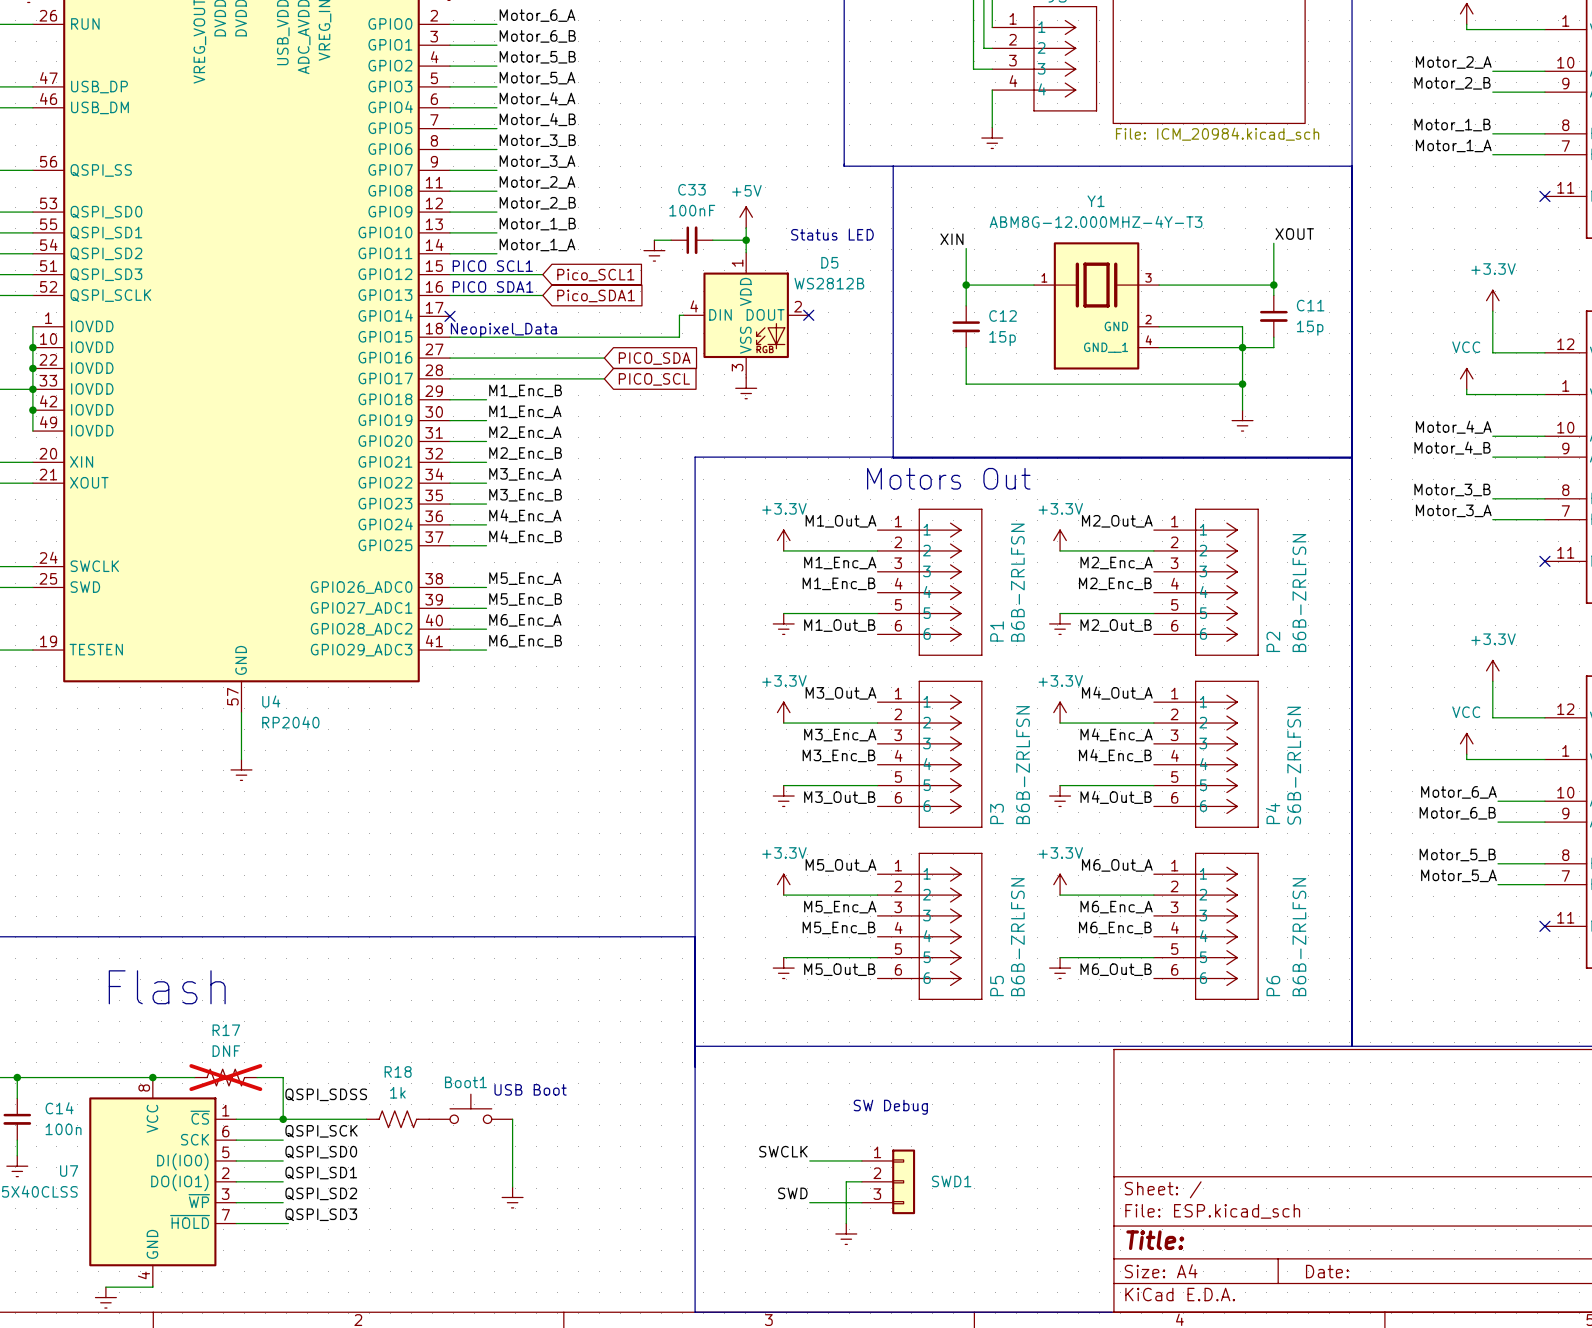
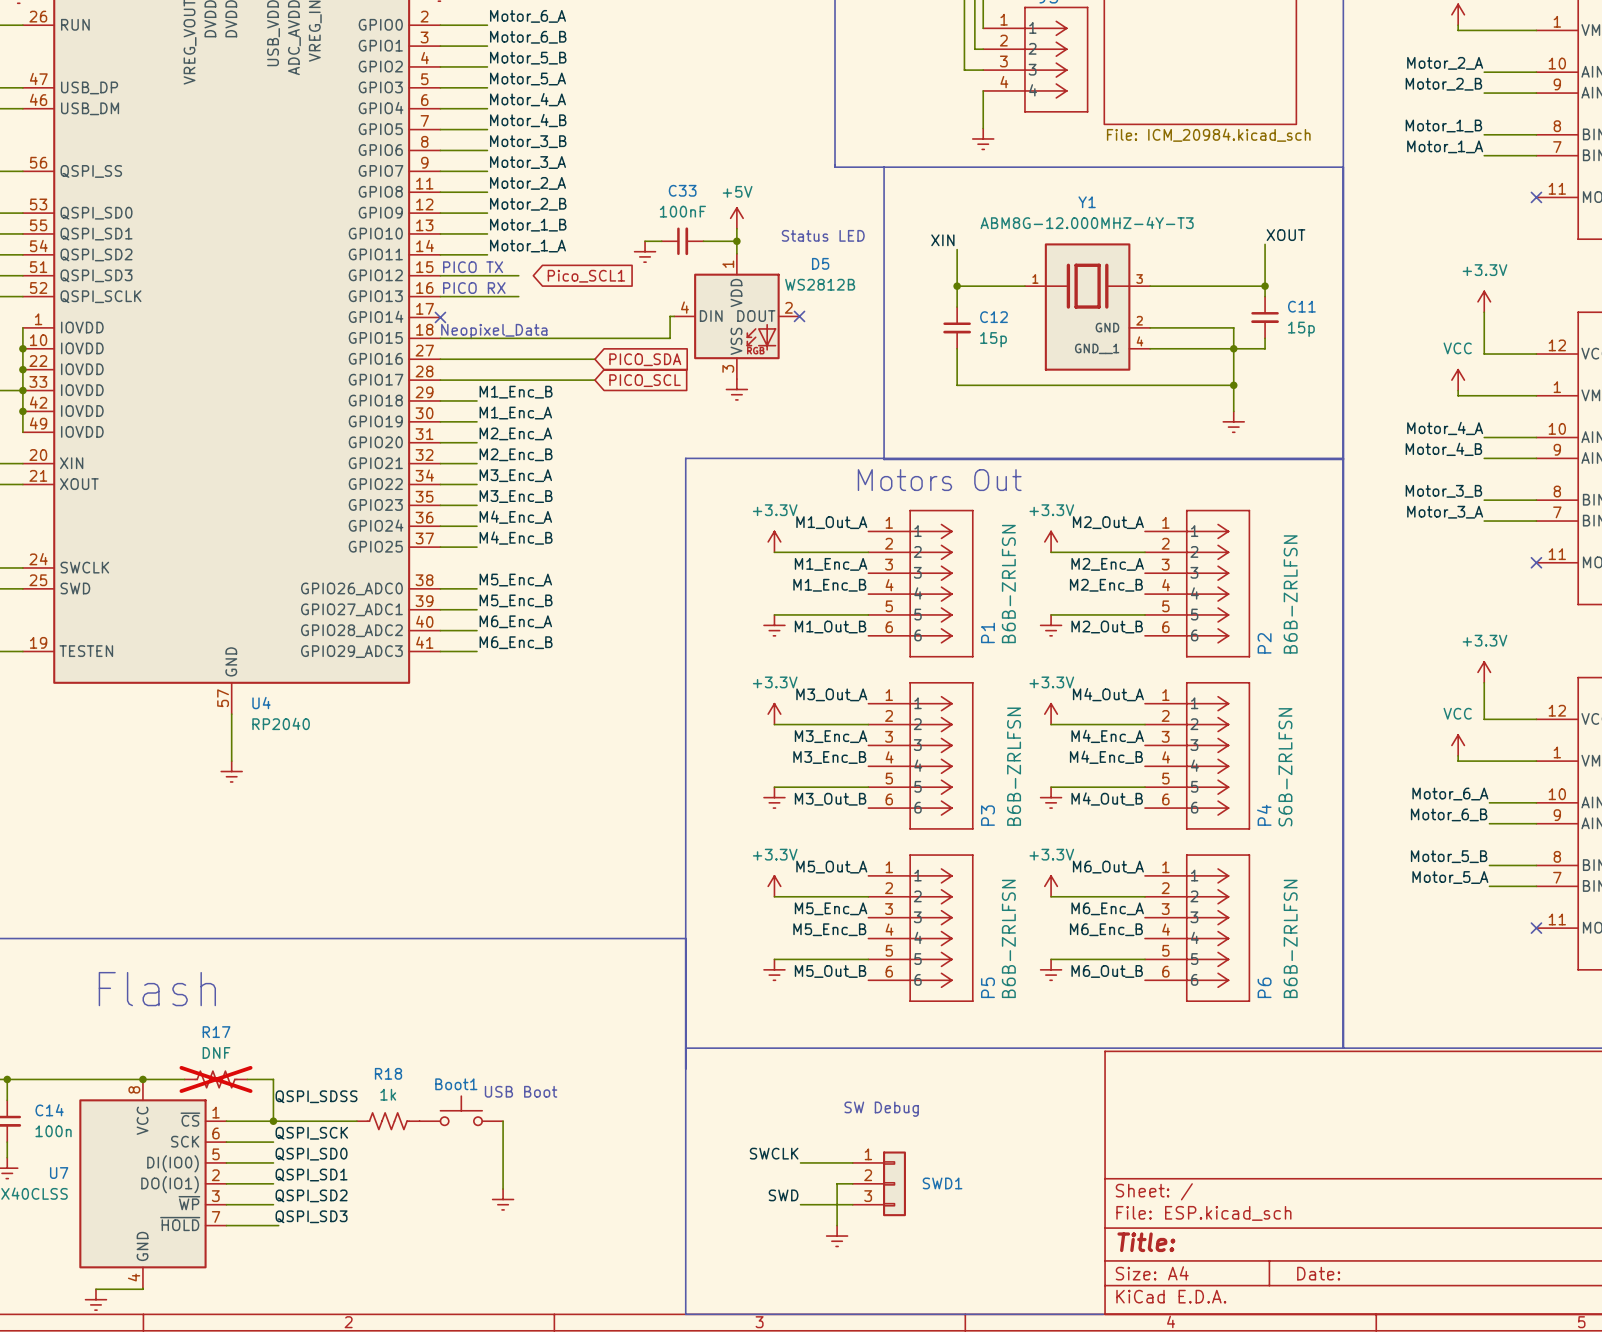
text: PICO SCL1 (492, 266) -> PICO TX (473, 267)
wire: (528, 274) (542, 274) -> none
text: PICO SDA1 (493, 286) -> PICO RX (474, 288)
wire: (528, 295) (542, 295) -> none
global label: Pico_SDA1 (596, 295) -> none

